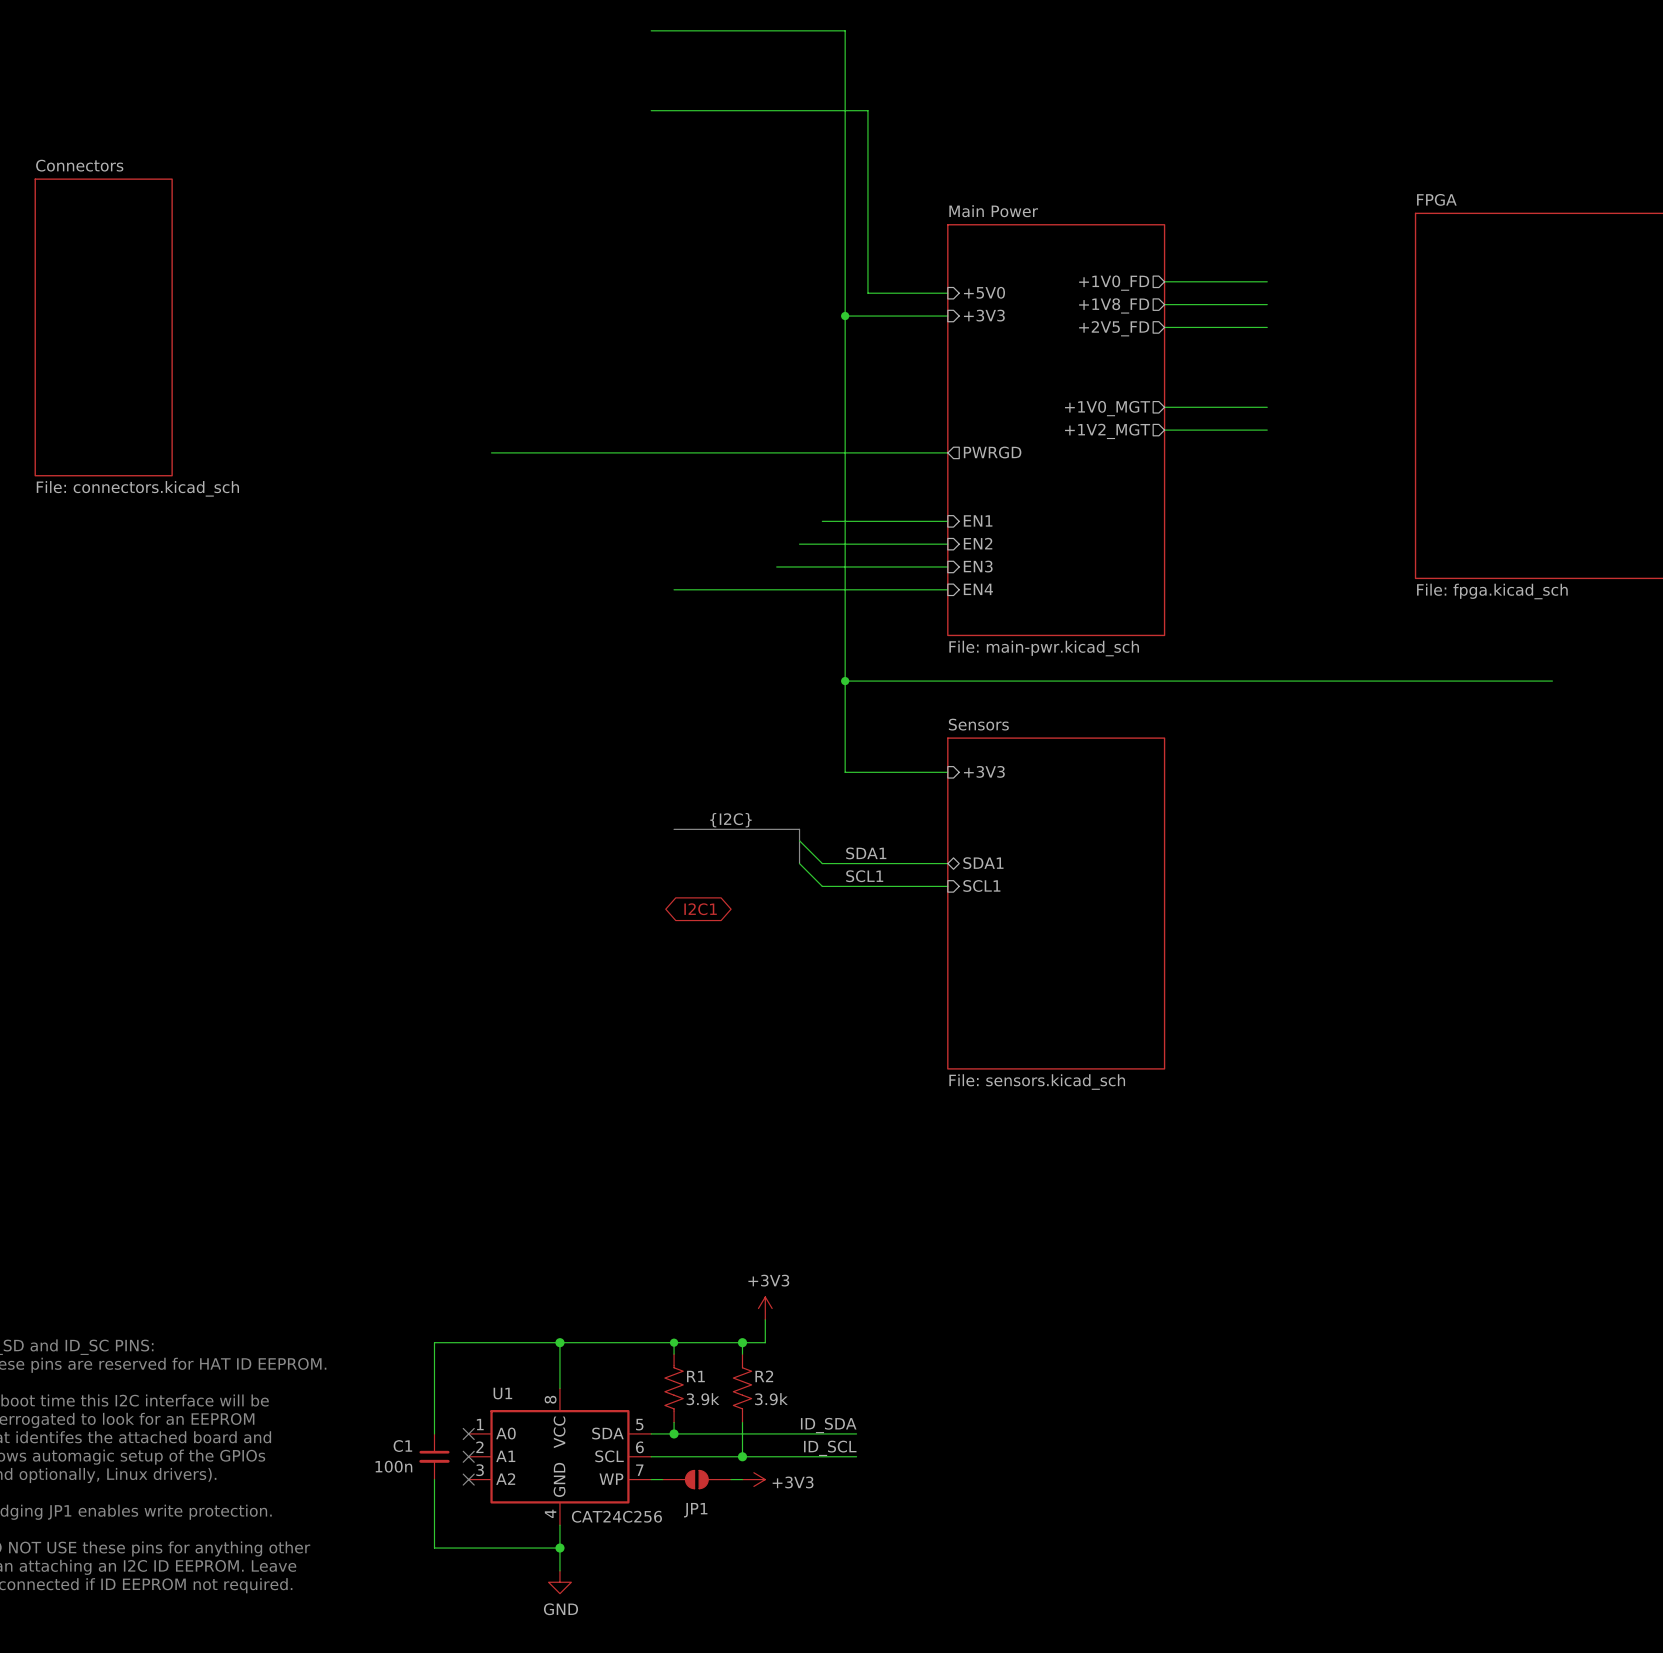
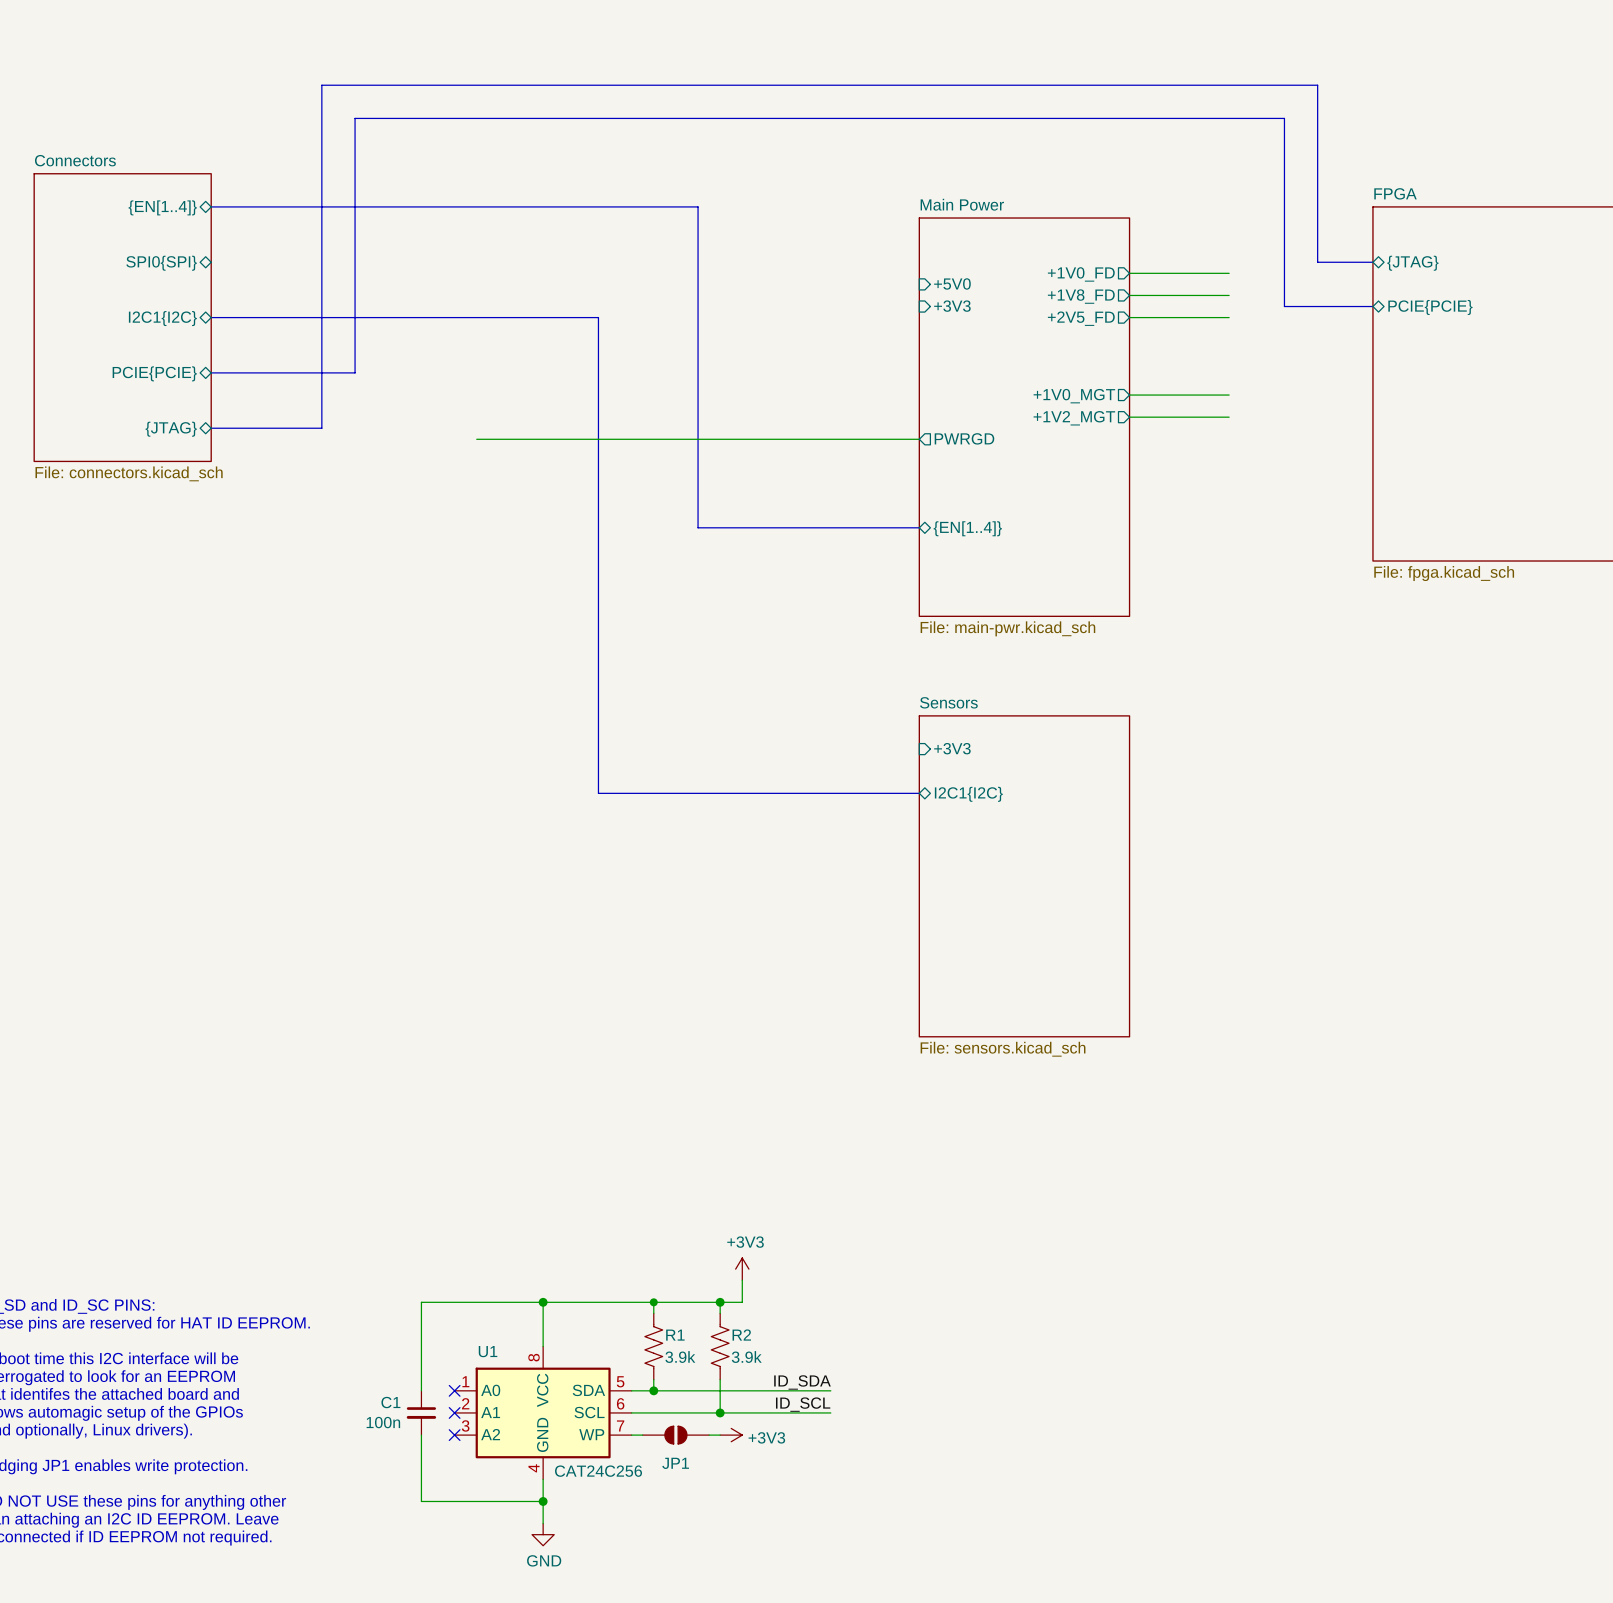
wire: (651, 30) (845, 30) (845, 772) (947, 772) -> none
wire: (651, 110) (867, 110) (867, 293) (947, 293) -> none
sheet pin: none -> {EN[1..4]} (162, 207)
bus: none -> (211, 206) (698, 206) (698, 527) (919, 527)
bus: none -> (1372, 262) (1317, 262) (1317, 85) (321, 85) (321, 428) (211, 428)
sheet pin: none -> SPI0{SPI} (161, 263)
sheet pin: none -> {JTAG} (1412, 263)
wire: (845, 316) (947, 316) -> none
junction: (845, 316) -> none
bus: none -> (1372, 306) (1284, 306) (1284, 118) (355, 118) (355, 372) (211, 372)
sheet pin: none -> PCIE{PCIE} (1430, 307)
sheet Connectors: File: connectors.kicad_sch (103, 327) -> none
sheet Connectors: none -> File: connectors.kicad_sch (122, 317)
bus: none -> (211, 317) (598, 317) (598, 793) (919, 793)
sheet pin: none -> I2C1{I2C} (162, 318)
sheet pin: none -> PCIE{PCIE} (154, 373)
sheet pin: none -> {JTAG} (171, 429)
sheet pin: EN1 (978, 520) -> none
wire: (822, 521) (947, 521) -> none
sheet pin shape: input (978, 543) -> bidirectional (967, 528)
sheet pin: EN2 (978, 543) -> {EN[1..4]} (967, 528)
wire: (776, 566) (947, 566) -> none
sheet pin: EN3 (978, 566) -> none
wire: (674, 589) (947, 589) -> none
sheet pin: EN4 (978, 589) -> none
wire: (845, 681) (1552, 681) -> none
junction: (845, 681) -> none
sheet pin: none -> I2C1{I2C} (968, 794)
label: {I2C} (730, 820) -> none
bus: (674, 829) (799, 829) (799, 863) -> none
wire: (799, 840) (822, 863) (947, 863) -> none
label: SDA1 (866, 853) -> none
wire: (799, 863) (822, 886) (947, 886) -> none
sheet pin: SDA1 (983, 863) -> none
label: SCL1 (864, 876) -> none
sheet pin: SCL1 (981, 885) -> none
global label: I2C1 (700, 909) -> none

